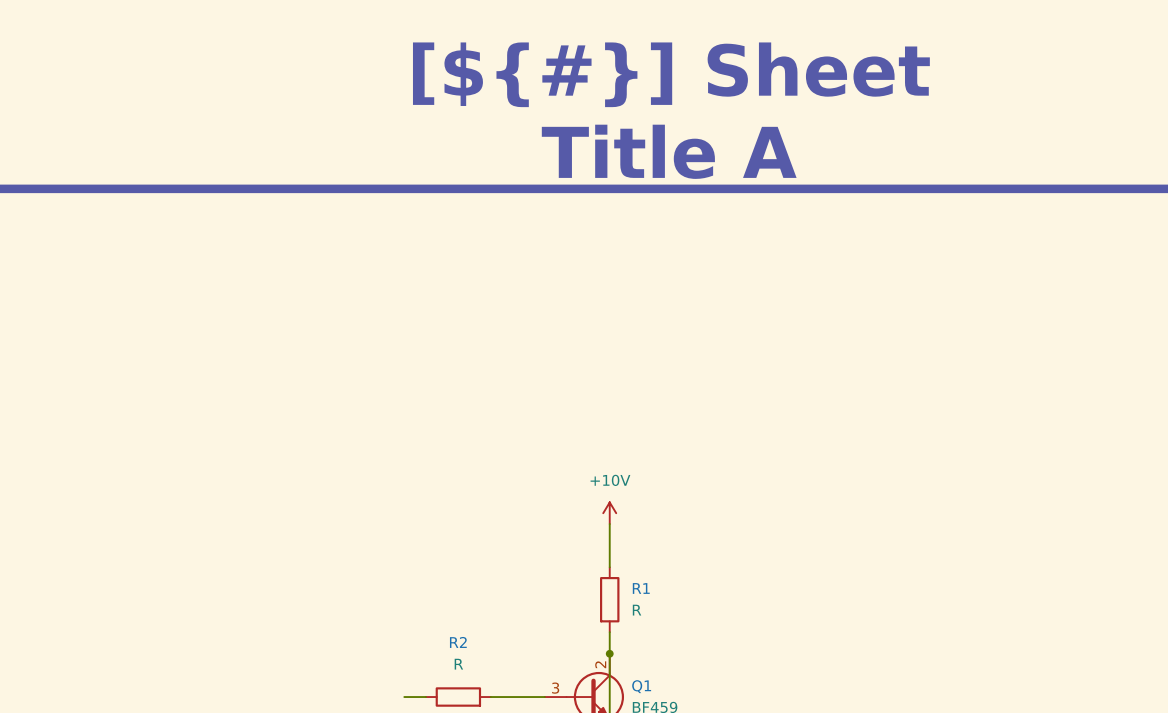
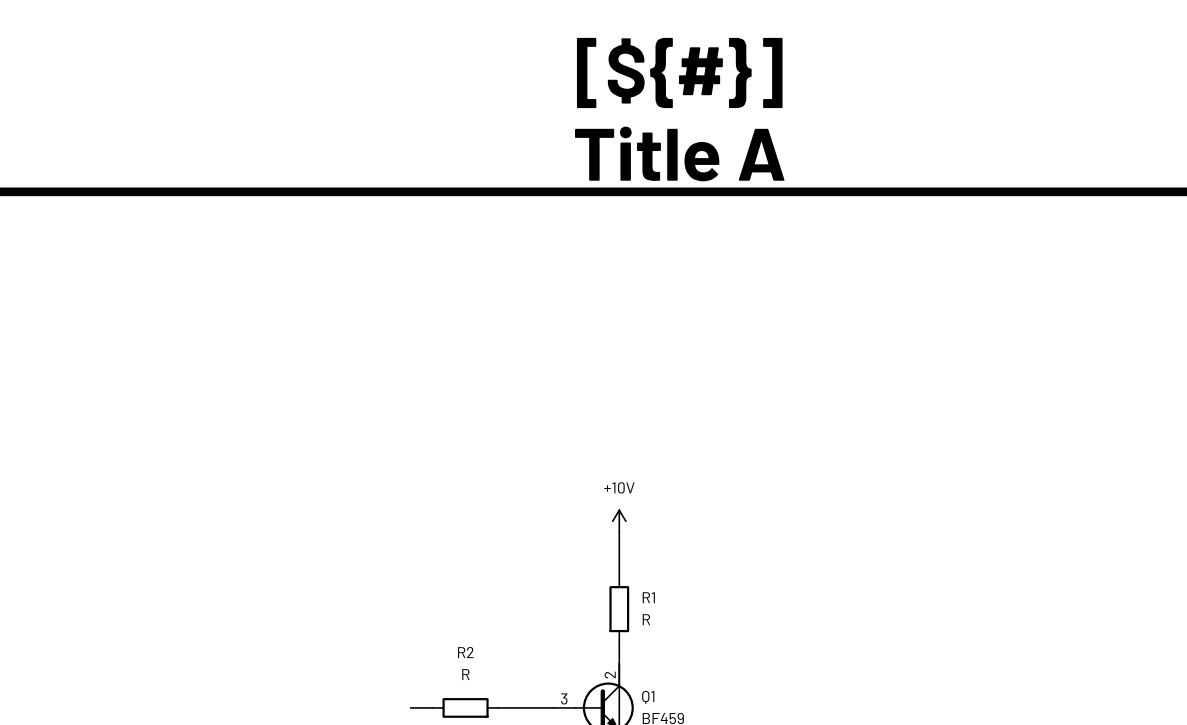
text: [${#}] Sheet (671, 74) -> [${#}] (679, 72)
junction: (609, 653) -> none

